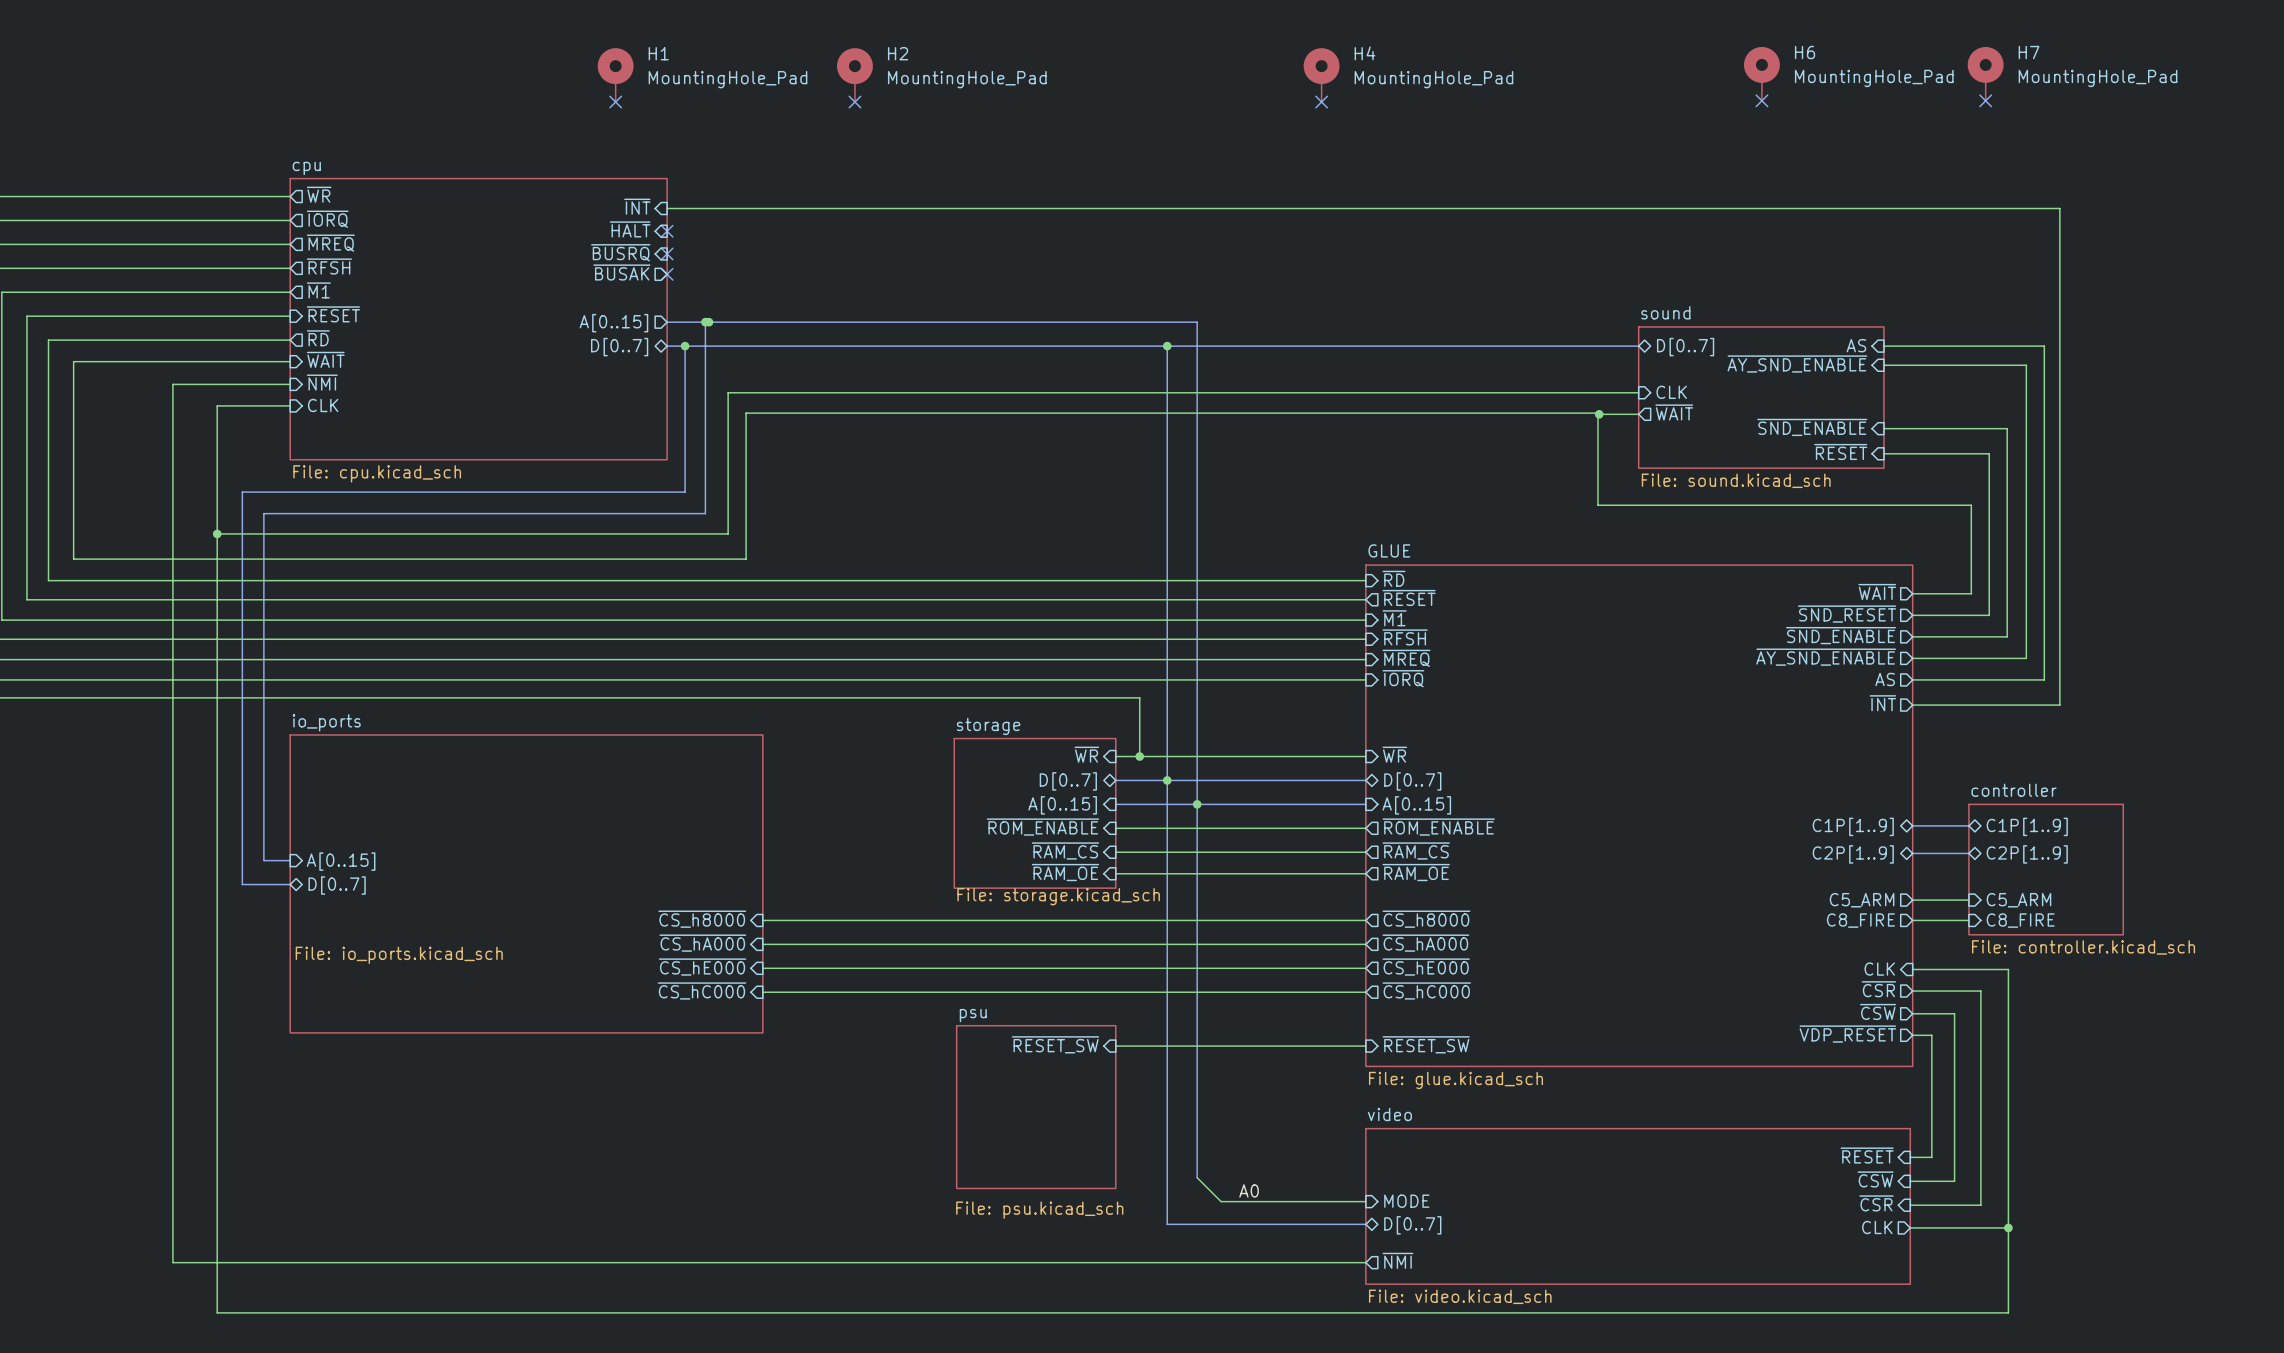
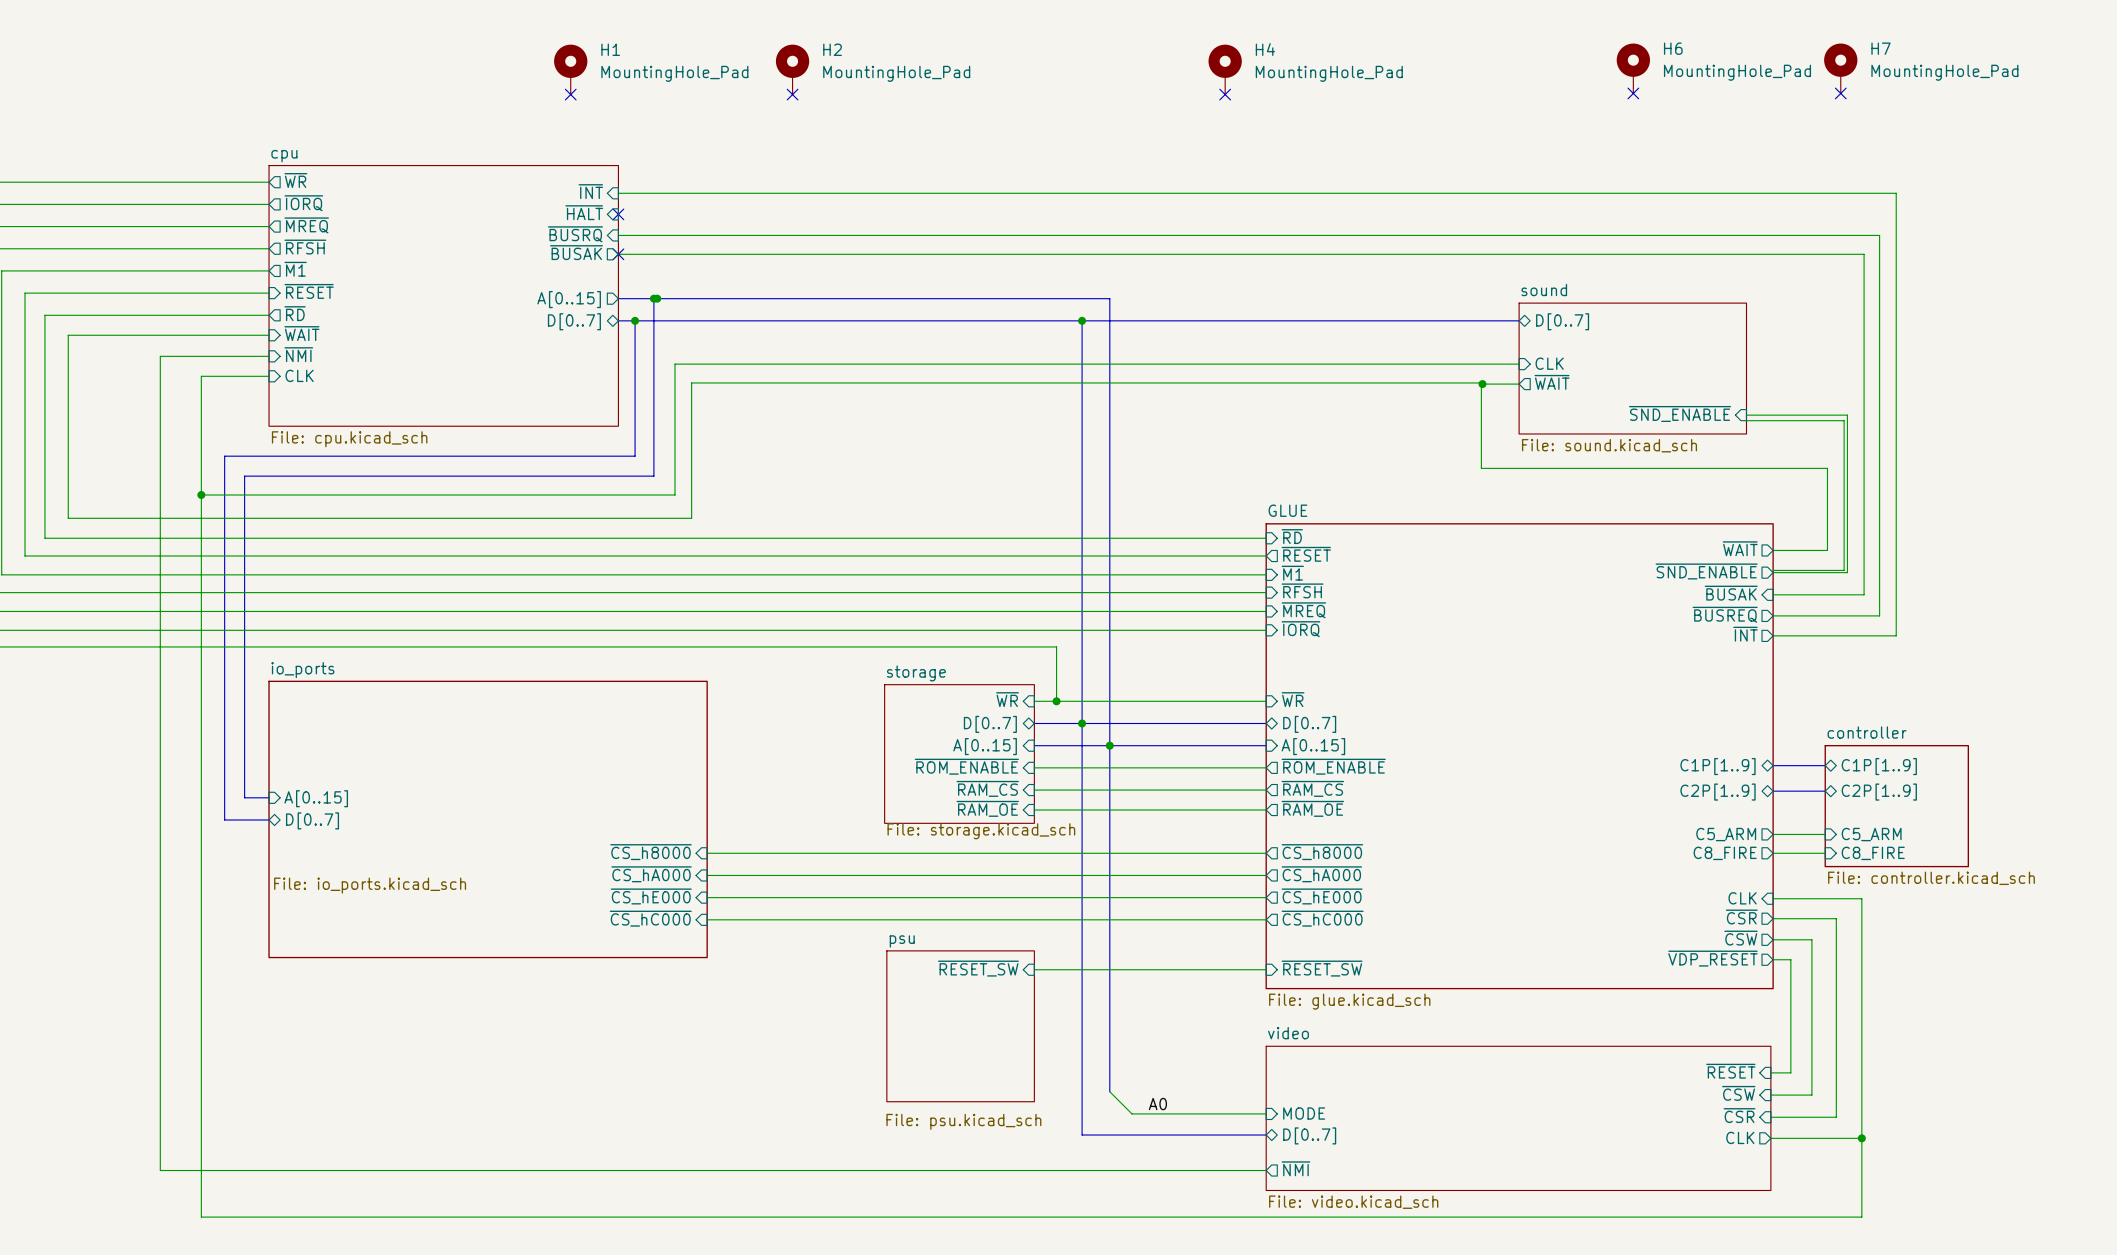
wire: (2045, 208) (2059, 208) (2059, 705) (1912, 705) -> (1896, 193) (1896, 635) (1773, 635)
wire: none -> (618, 235) (1879, 235) (1879, 615) (1773, 615)
no-connect mark: (667, 253) -> none
wire: none -> (618, 254) (1864, 254) (1864, 594) (1773, 594)
sheet pin: AS (1856, 345) -> none
wire: (1883, 346) (2044, 346) (2044, 679) (1912, 679) -> none
sheet pin: ~{AY_SND_ENABLE} (1797, 364) -> none
wire: (1883, 365) (2026, 365) (2026, 658) (1912, 658) -> none
sheet pin position: ~{SND_ENABLE} (1812, 427) -> ~{SND_ENABLE} (1680, 413)
wire: (1883, 428) (2007, 428) (2007, 636) (1912, 636) -> none
wire: none -> (1746, 415) (1847, 415) (1847, 572) (1773, 572)
sheet pin: ~{RESET} (1840, 451) -> none
sheet pin: ~{SND_RESET} (1847, 614) -> none
sheet pin position: ~{SND_ENABLE} (1840, 635) -> ~{SND_ENABLE} (1706, 571)
sheet pin: none -> ~{BUSAK} (1731, 593)
sheet pin: ~{AY_SND_ENABLE} (1826, 657) -> ~{BUSREQ} (1725, 614)
sheet pin: AS (1885, 679) -> none
sheet pin position: ~{INT} (1882, 703) -> ~{INT} (1745, 634)

